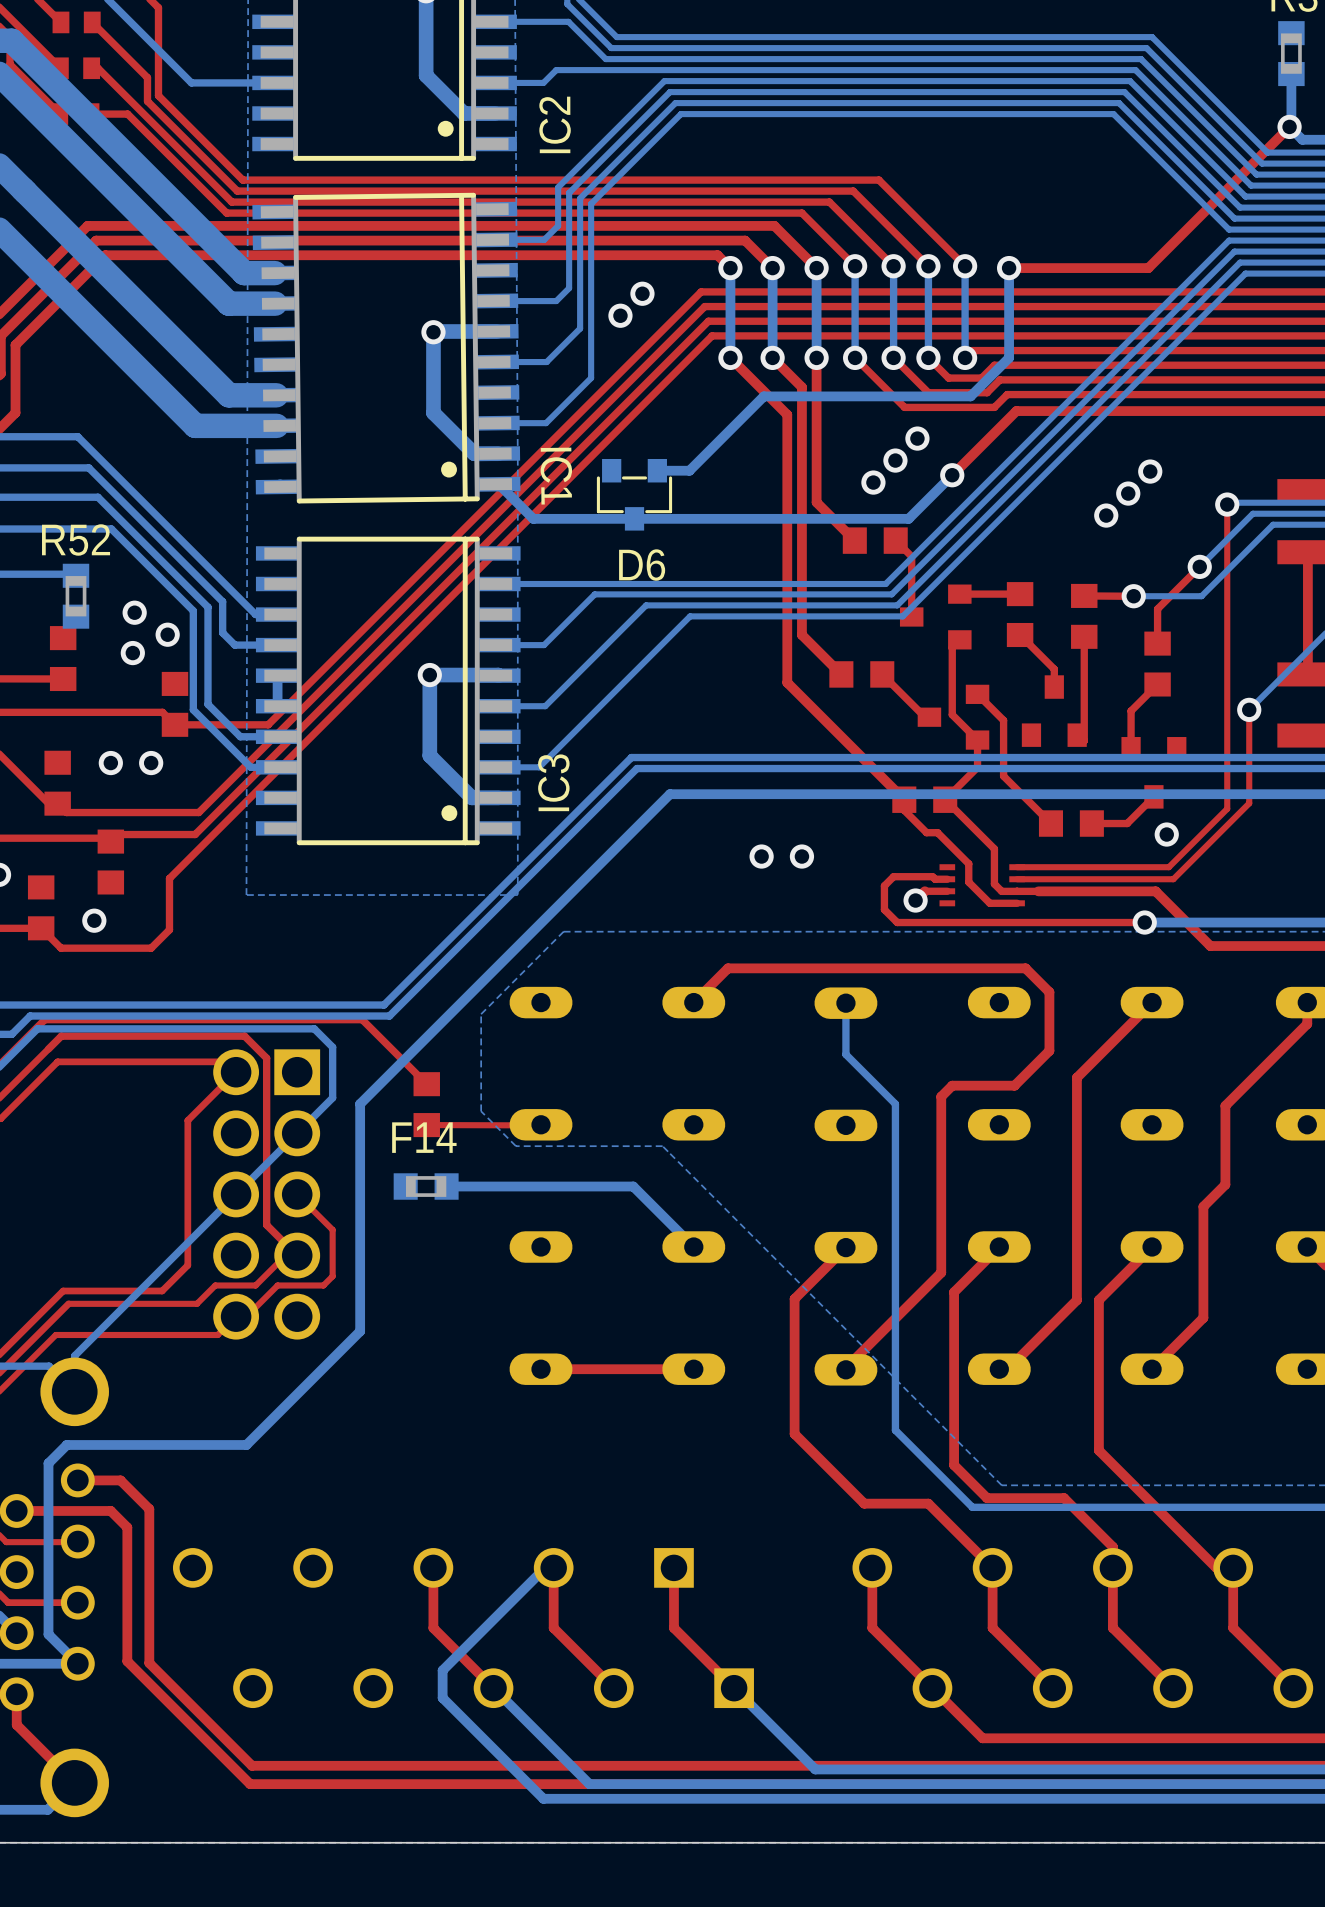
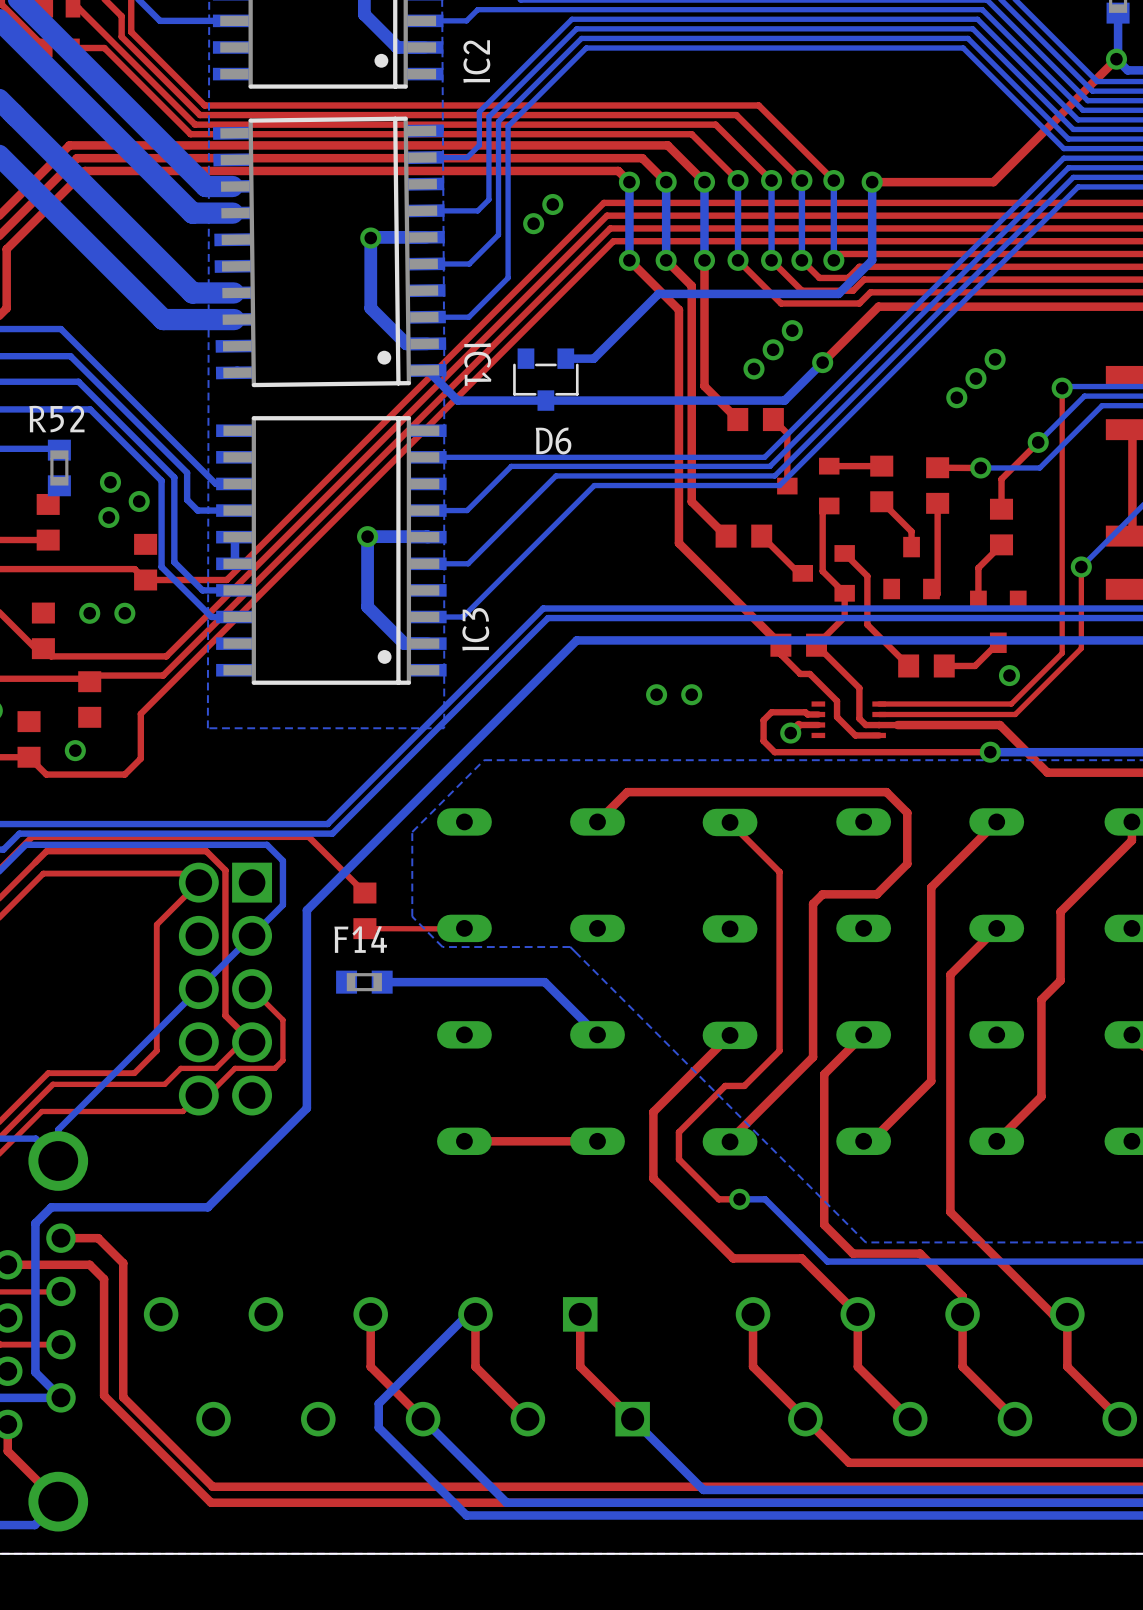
bottom track: (845, 1003) (845, 1054) (895, 1104) (895, 1430) (972, 1507) -> (739, 1199) (765, 1199) (827, 1261) (840, 1261)
top track: none -> (730, 822) (779, 871) (779, 1050) (744, 1085) (725, 1085) (678, 1132) (678, 1159) (718, 1199) (739, 1199)
top track: (1152, 1247) (1098, 1300) -> (996, 928) (950, 974) (950, 1081)
top track: (794, 1298) (794, 1433) (864, 1503) -> (685, 1080) (653, 1112) (653, 1178) (733, 1258) (746, 1258)
via: none -> (739, 1199)

